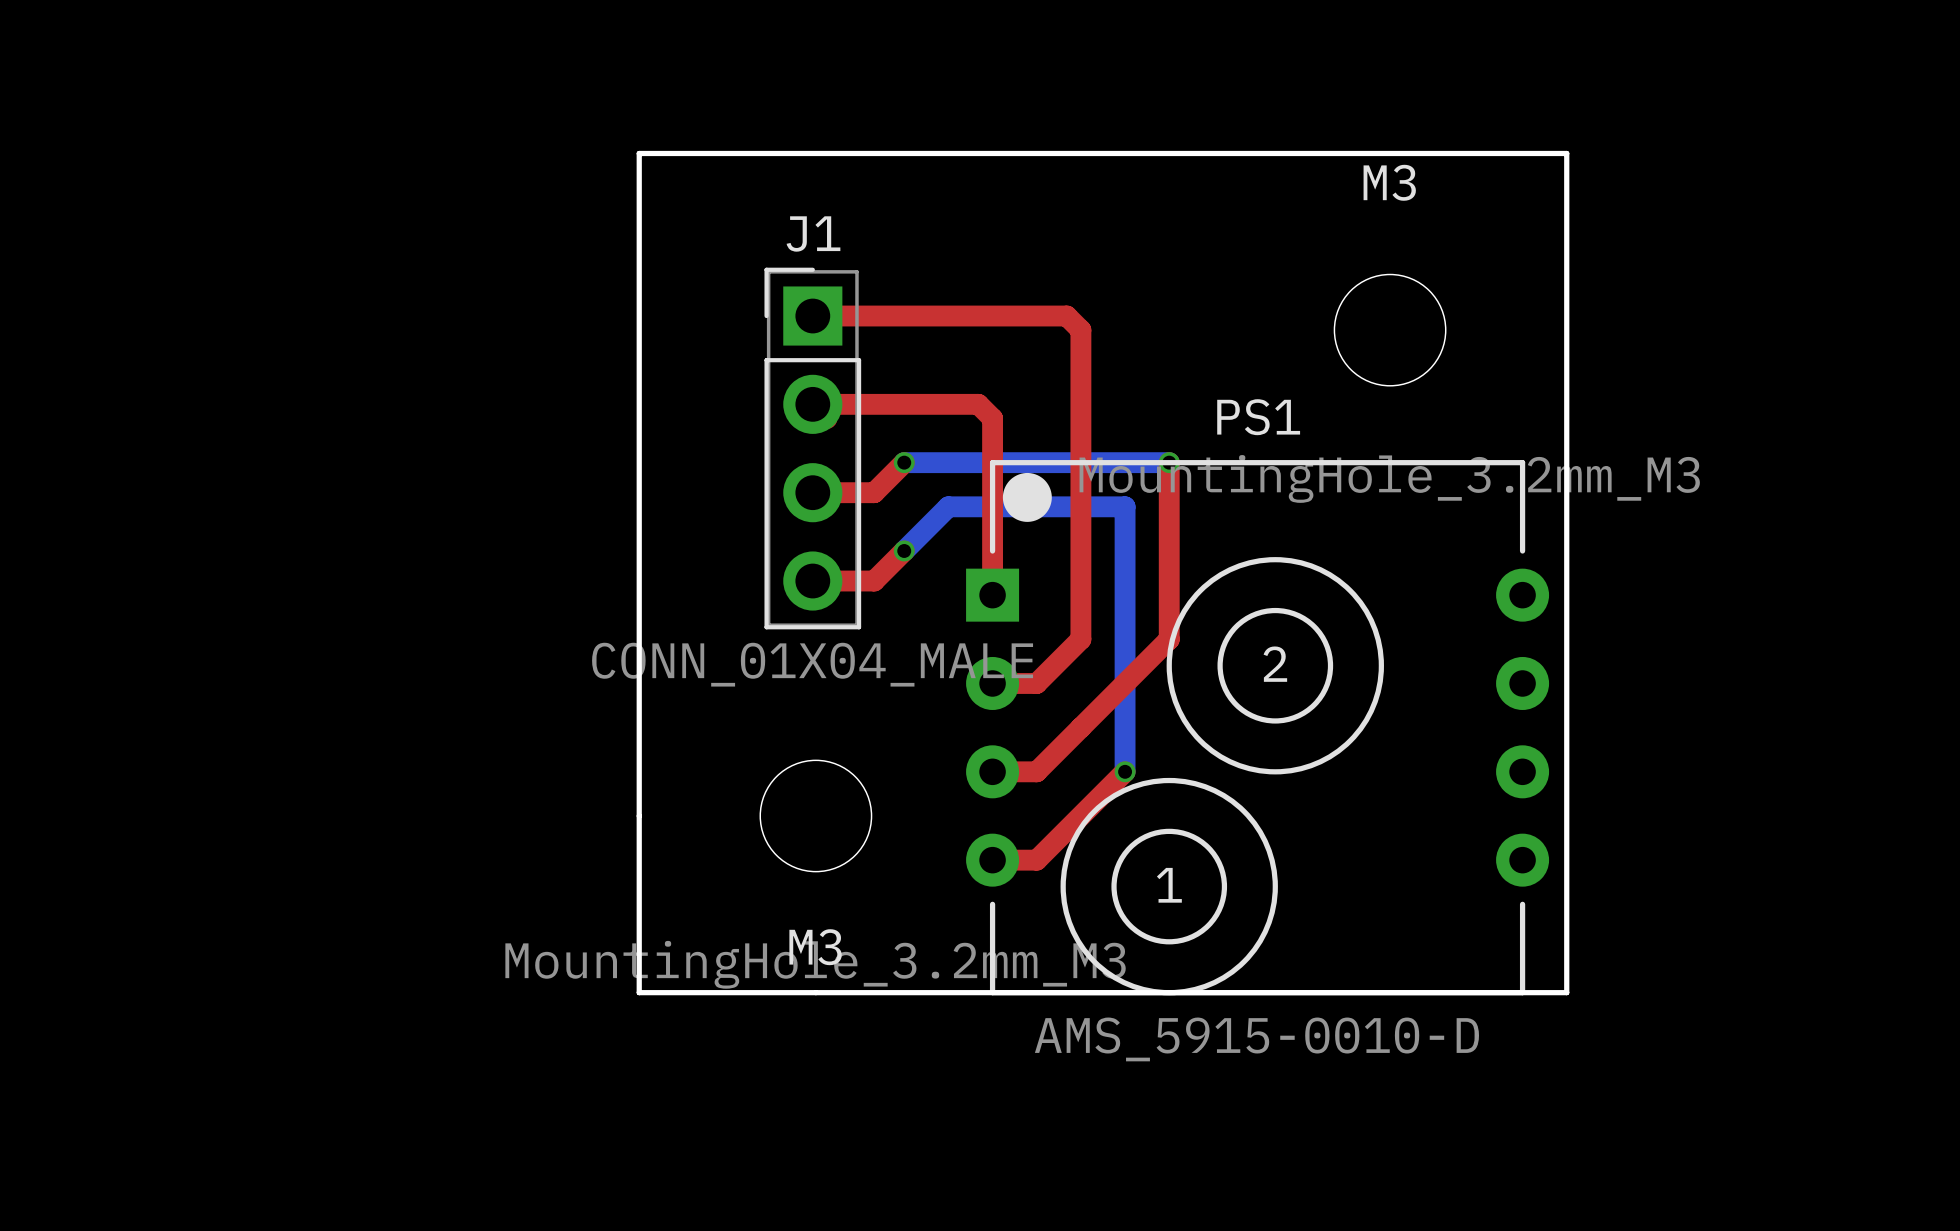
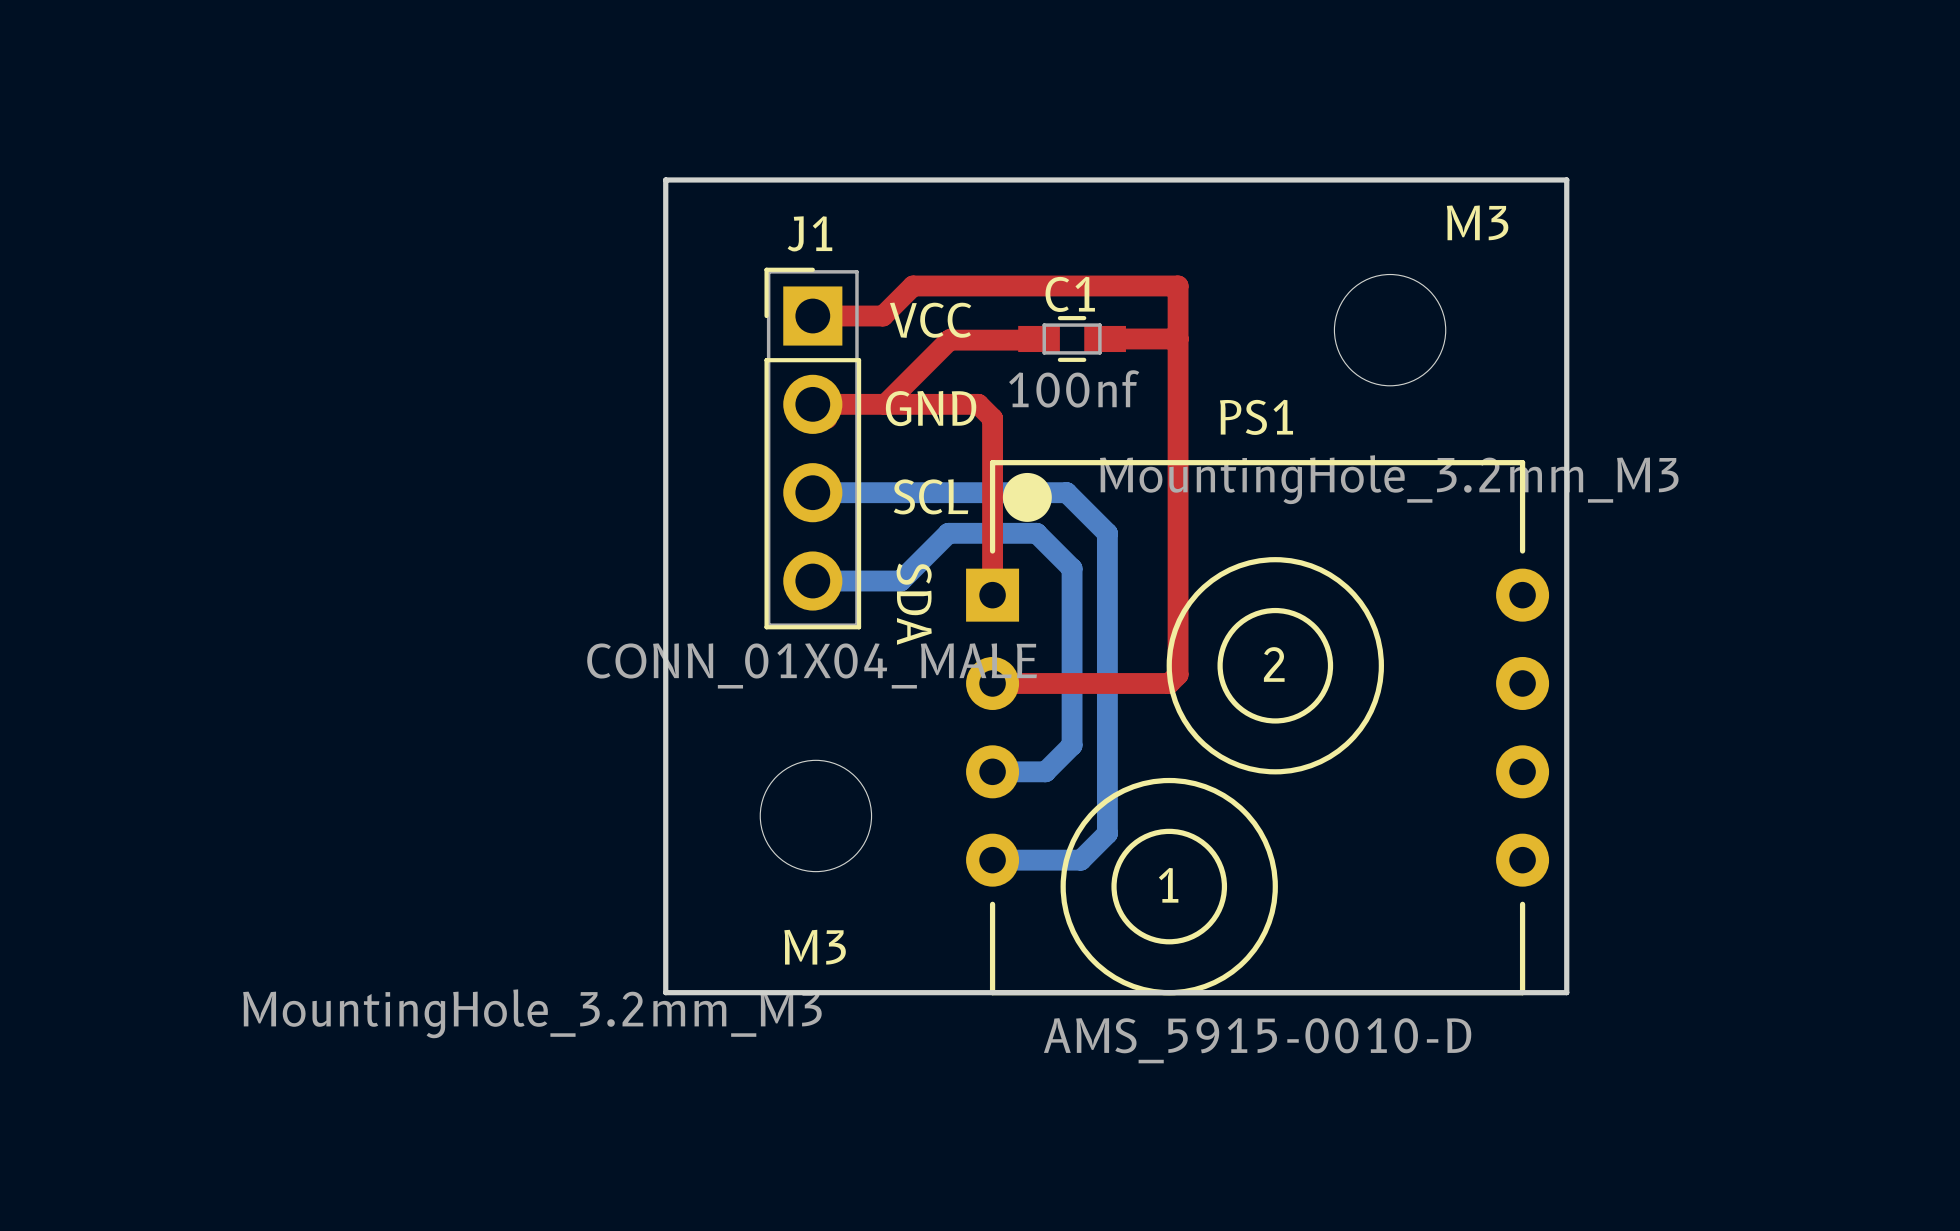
board edge: (1566, 179) (1566, 153) (639, 153) (639, 992) (665, 992) -> (1566, 179) (665, 179) (665, 992)
M3 name position: M3 (1389, 182) -> M3 (1477, 222)
top track: (883, 316) (1066, 316) (1080, 330) (1080, 639) (1036, 683) -> (883, 316) (913, 285) (1178, 285) (1178, 674) (1169, 683) (1036, 683)
text: none -> VCC (930, 320)
top track: none -> (950, 338) (885, 404)
top track: none -> (1039, 338) (949, 340)
C1: none -> 100nf (1072, 338)
top track: none -> (1105, 338) (1178, 338)
text: none -> GND (931, 408)
top track: (904, 462) (874, 492) (812, 492) -> none
bottom track: (904, 462) (1169, 462) -> none
via: (904, 462) -> none
top track: (1169, 462) (1169, 639) (1036, 771) (992, 771) -> none
via: (1169, 462) -> none
bottom track: none -> (812, 492) (1066, 492) (1107, 533) (1107, 833) (1080, 860) (992, 860)
text: none -> SCL (930, 496)
top track: (904, 550) (874, 581) (812, 581) -> none
bottom track: (904, 550) (948, 506) (1125, 506) (1125, 771) -> none
via: (904, 550) -> none
bottom track: none -> (812, 581) (900, 581) (948, 533) (1036, 533) (1072, 568) (1072, 745) (1045, 771) (992, 771)
text: none -> SDA (914, 604)
top track: (1125, 771) (1036, 860) (992, 860) -> none
via: (1125, 771) -> none
M3 value position: MountingHole_3.2mm_M3 (815, 964) -> MountingHole_3.2mm_M3 (532, 1013)

